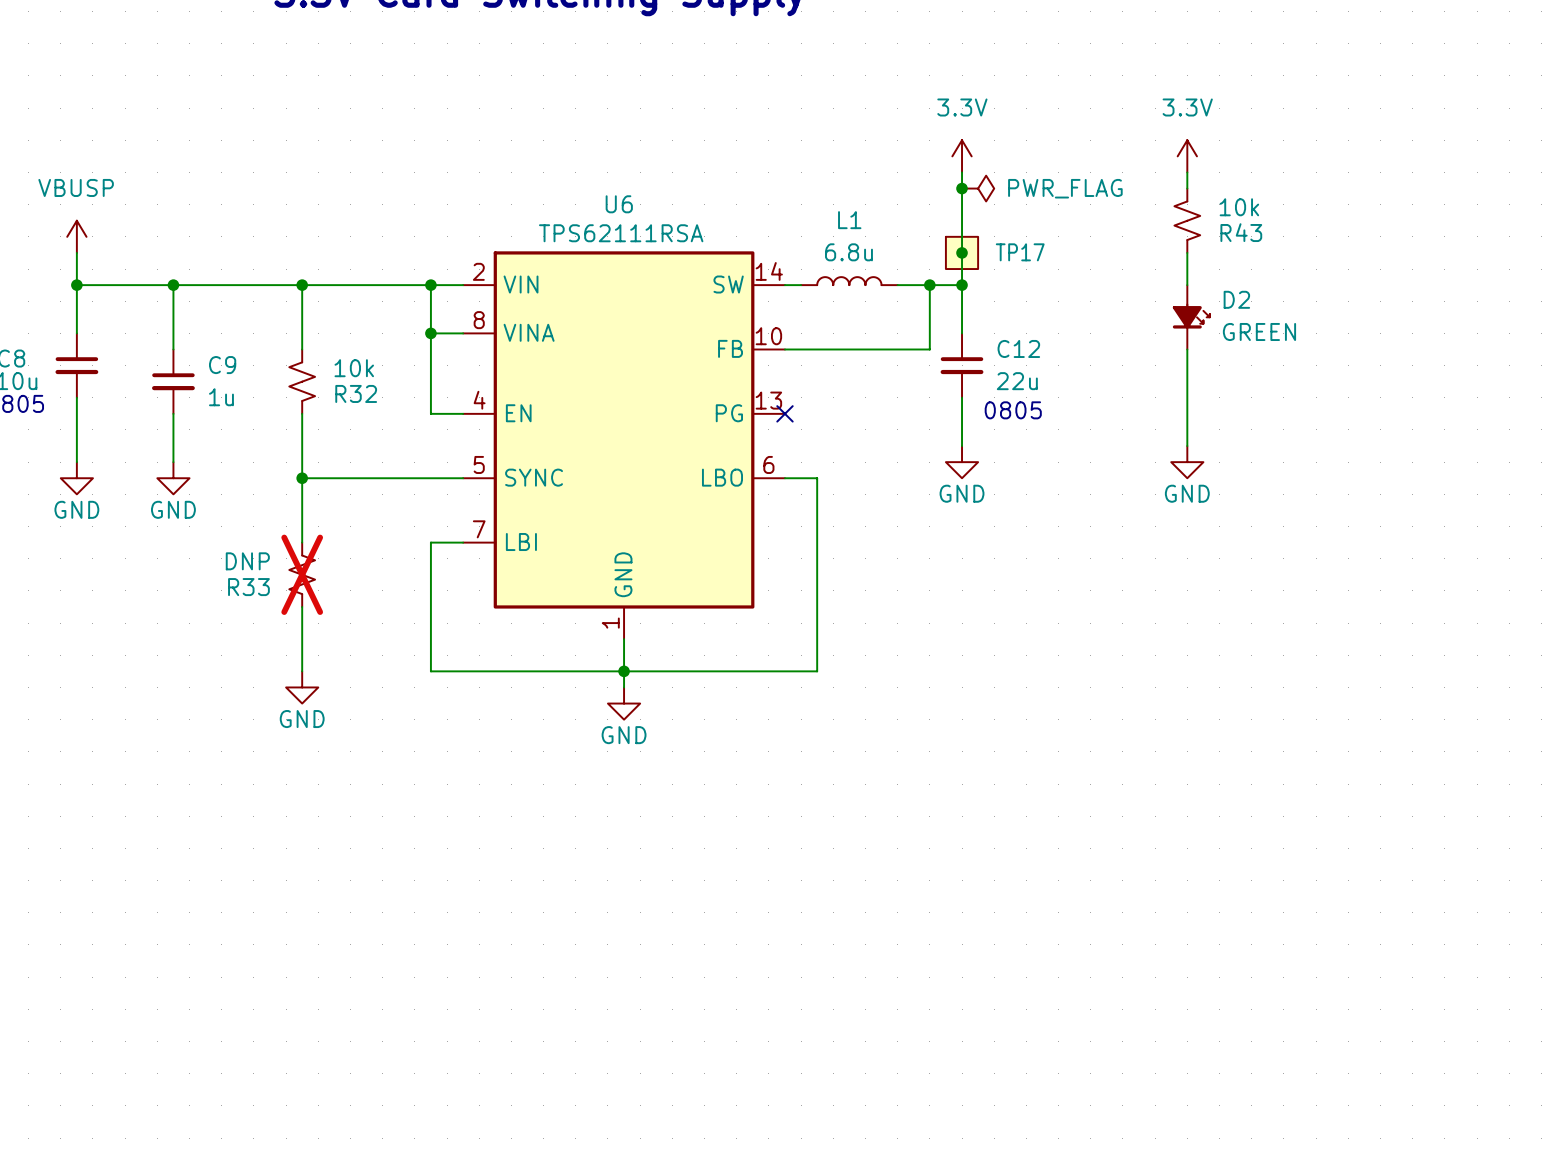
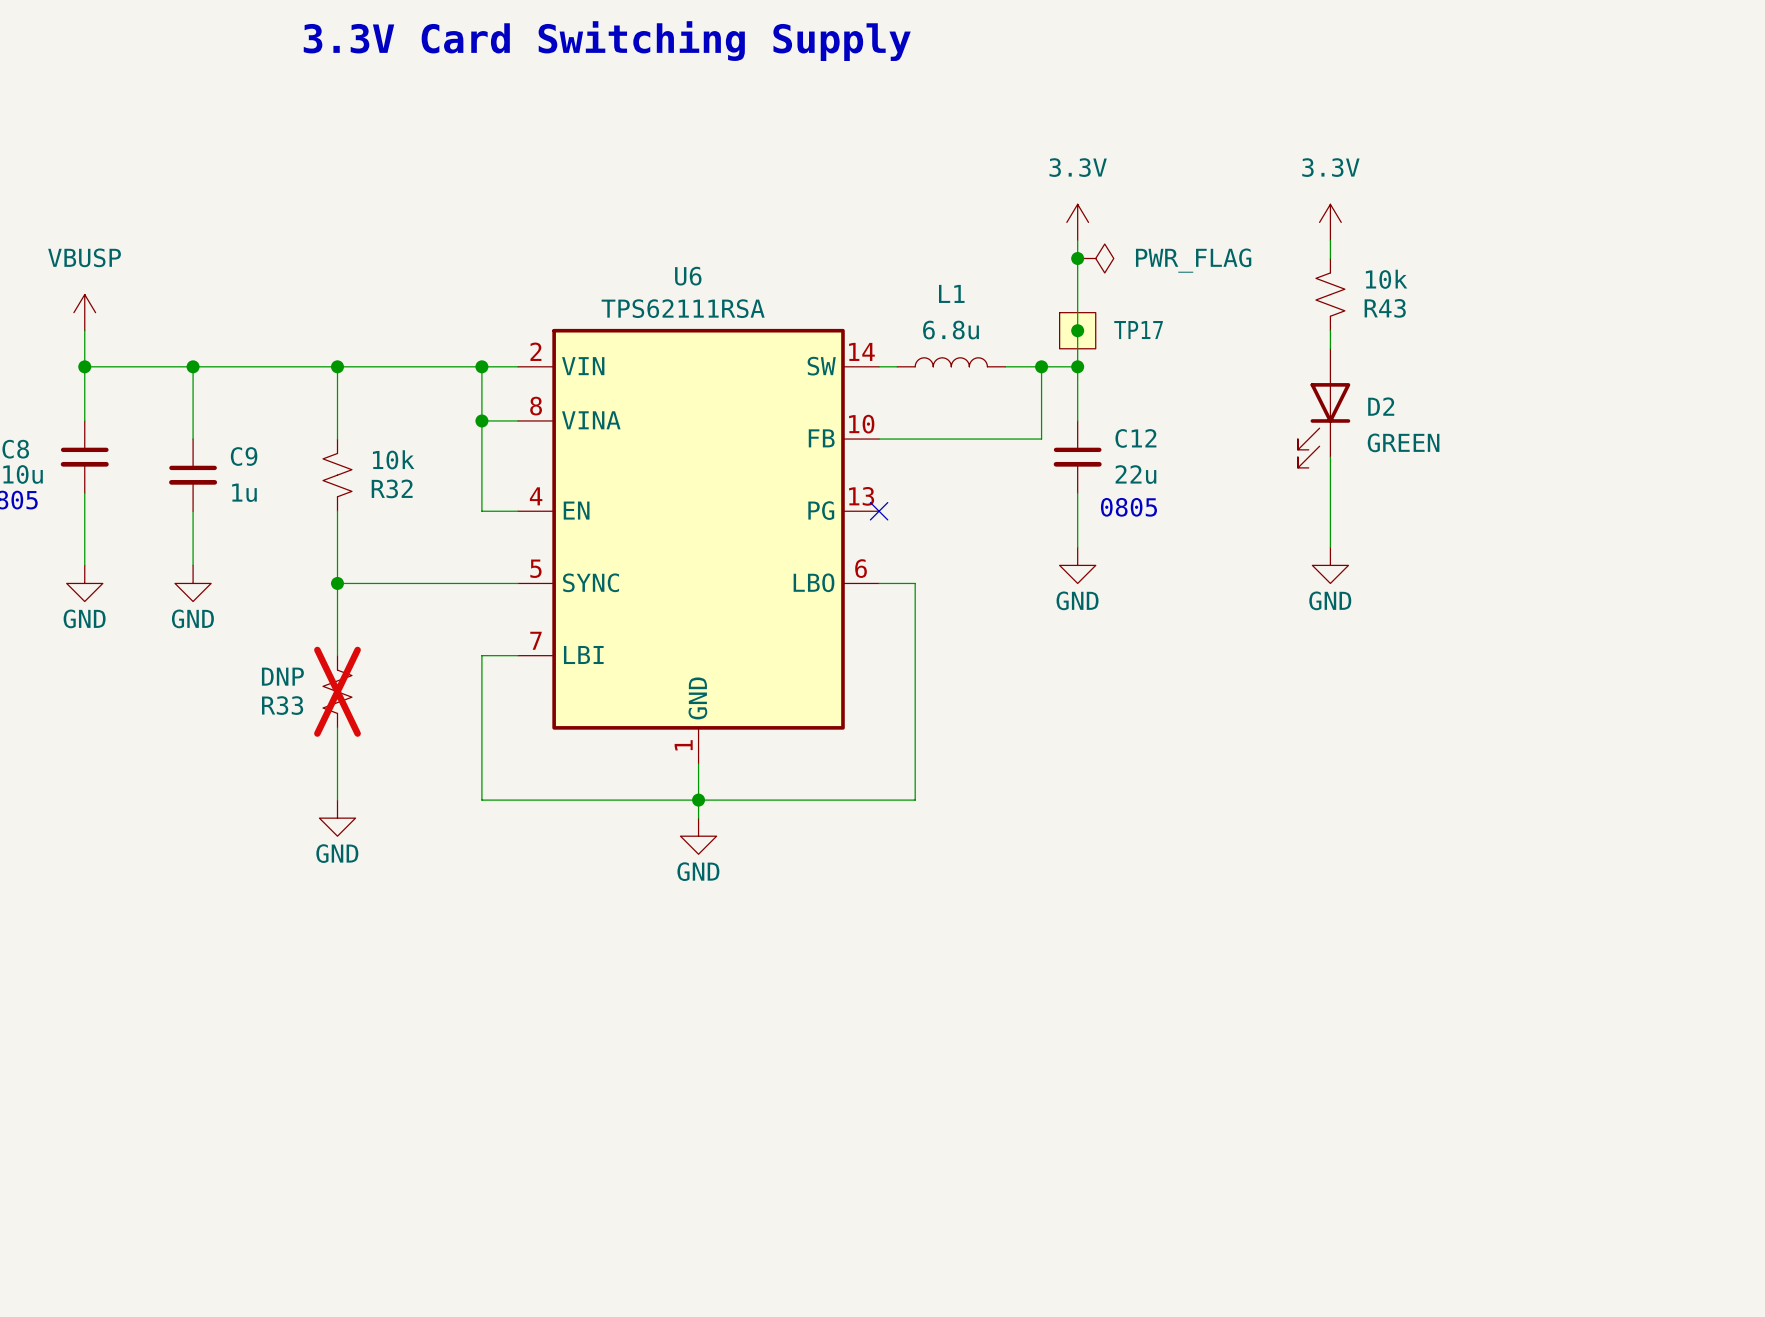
D2 symbol: [1172, 285, 1210, 350] -> [1297, 348, 1351, 468]

